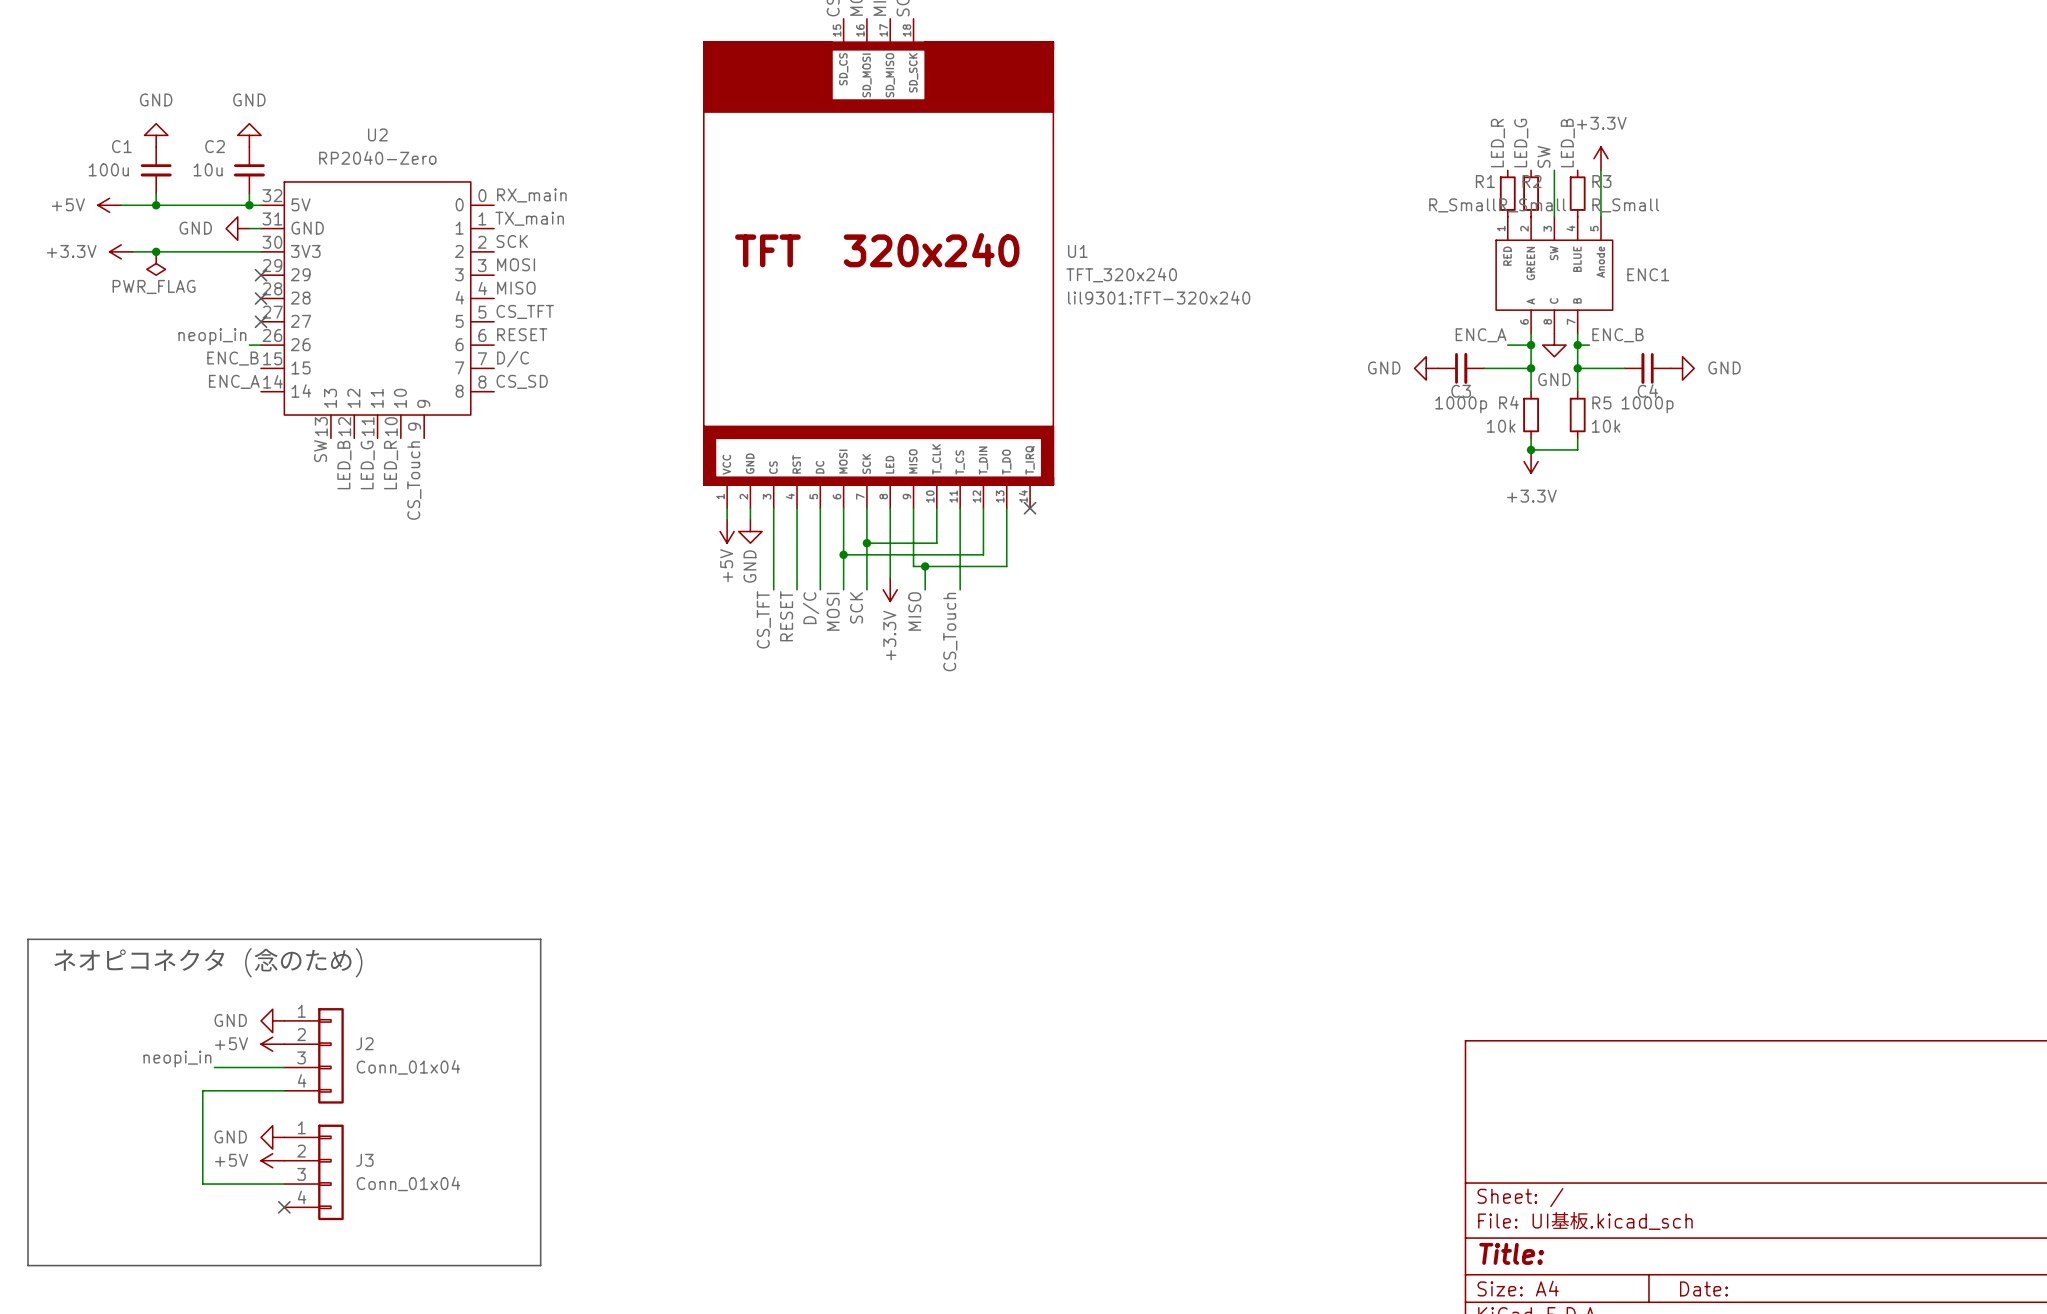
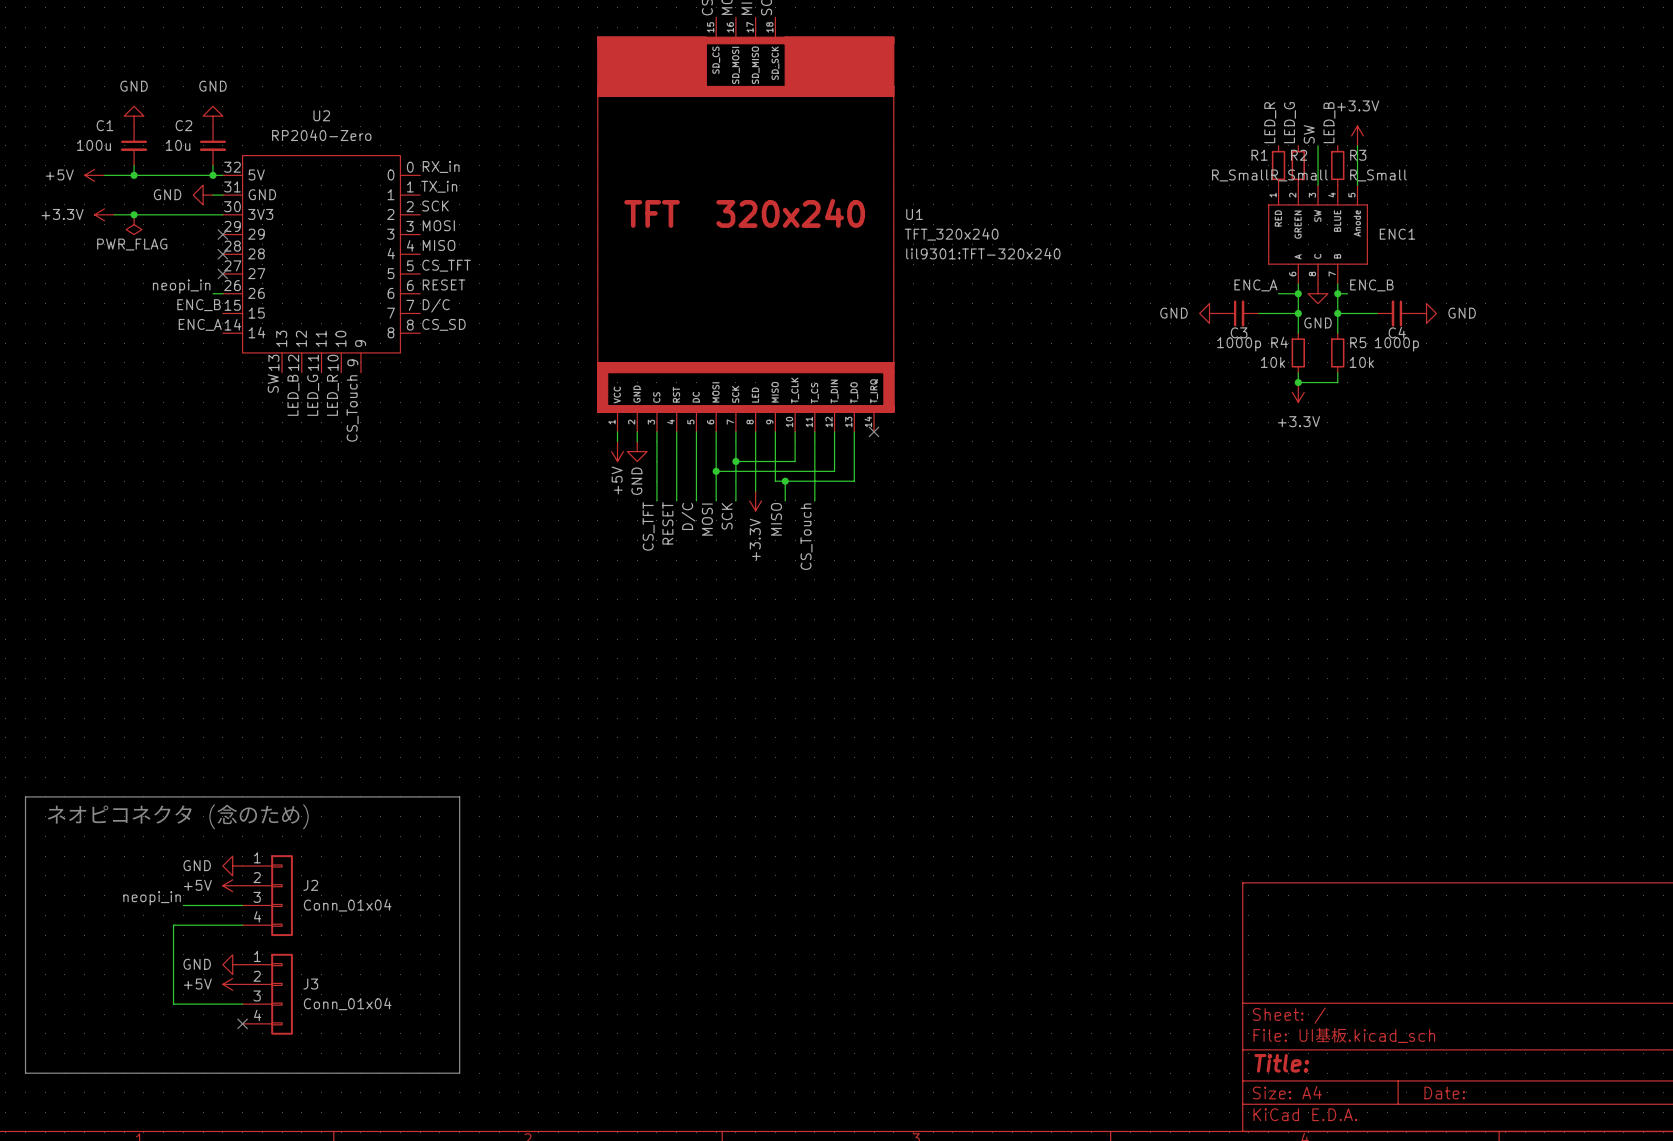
label: RX_main (531, 195) -> RX_in (441, 167)
label: TX_main (529, 218) -> TX_in (439, 186)

